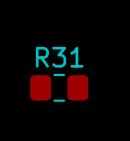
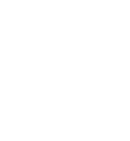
R31: (59, 87) -> none

